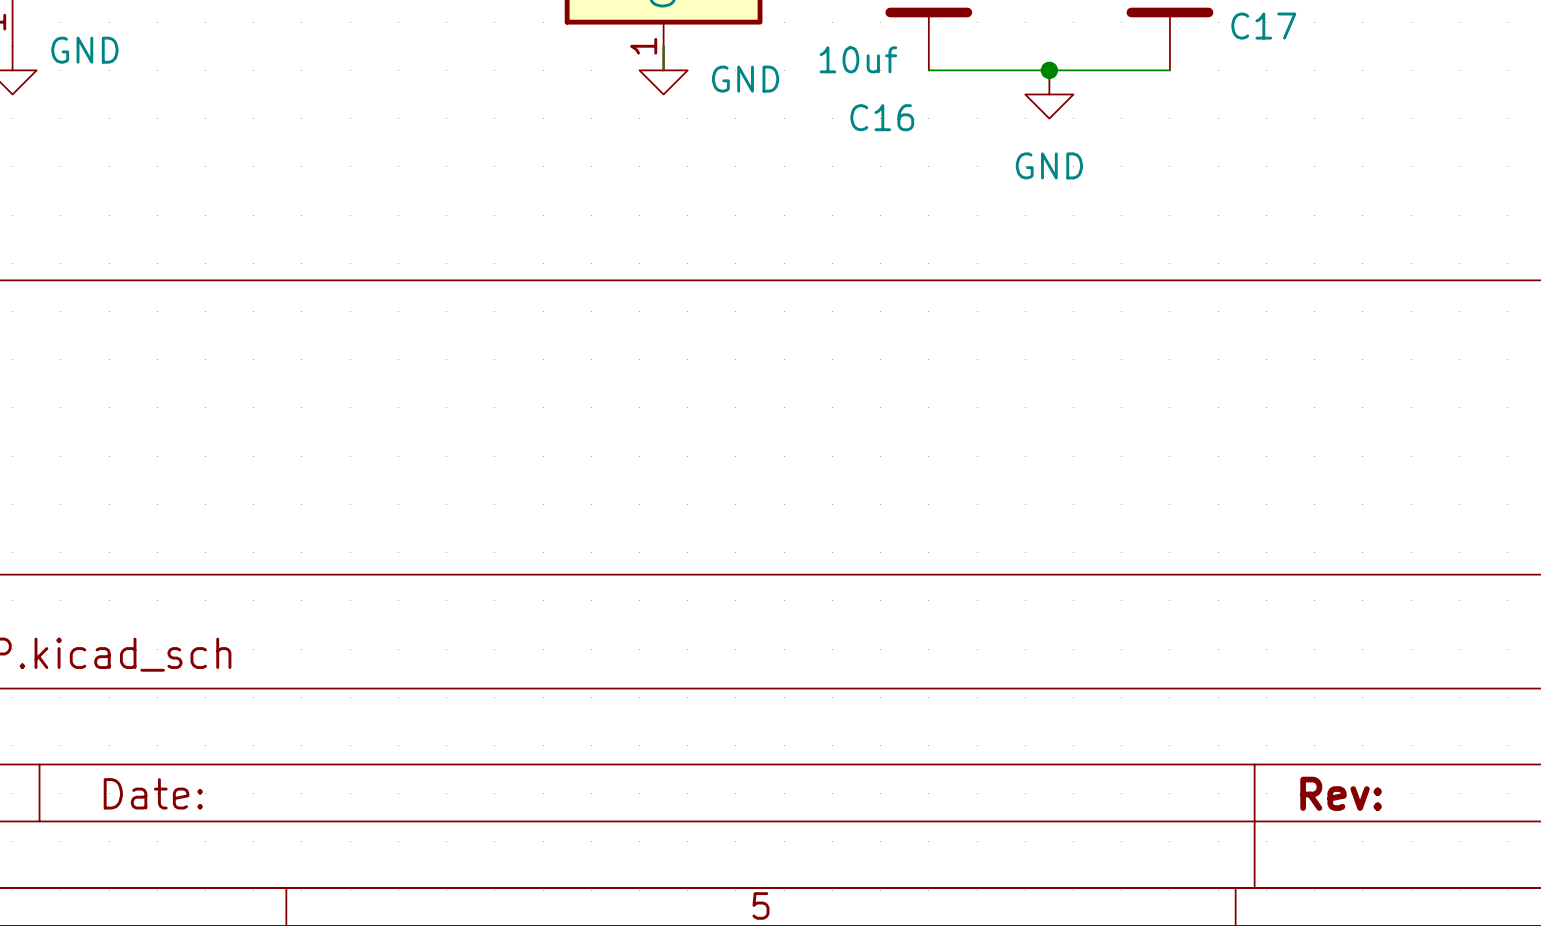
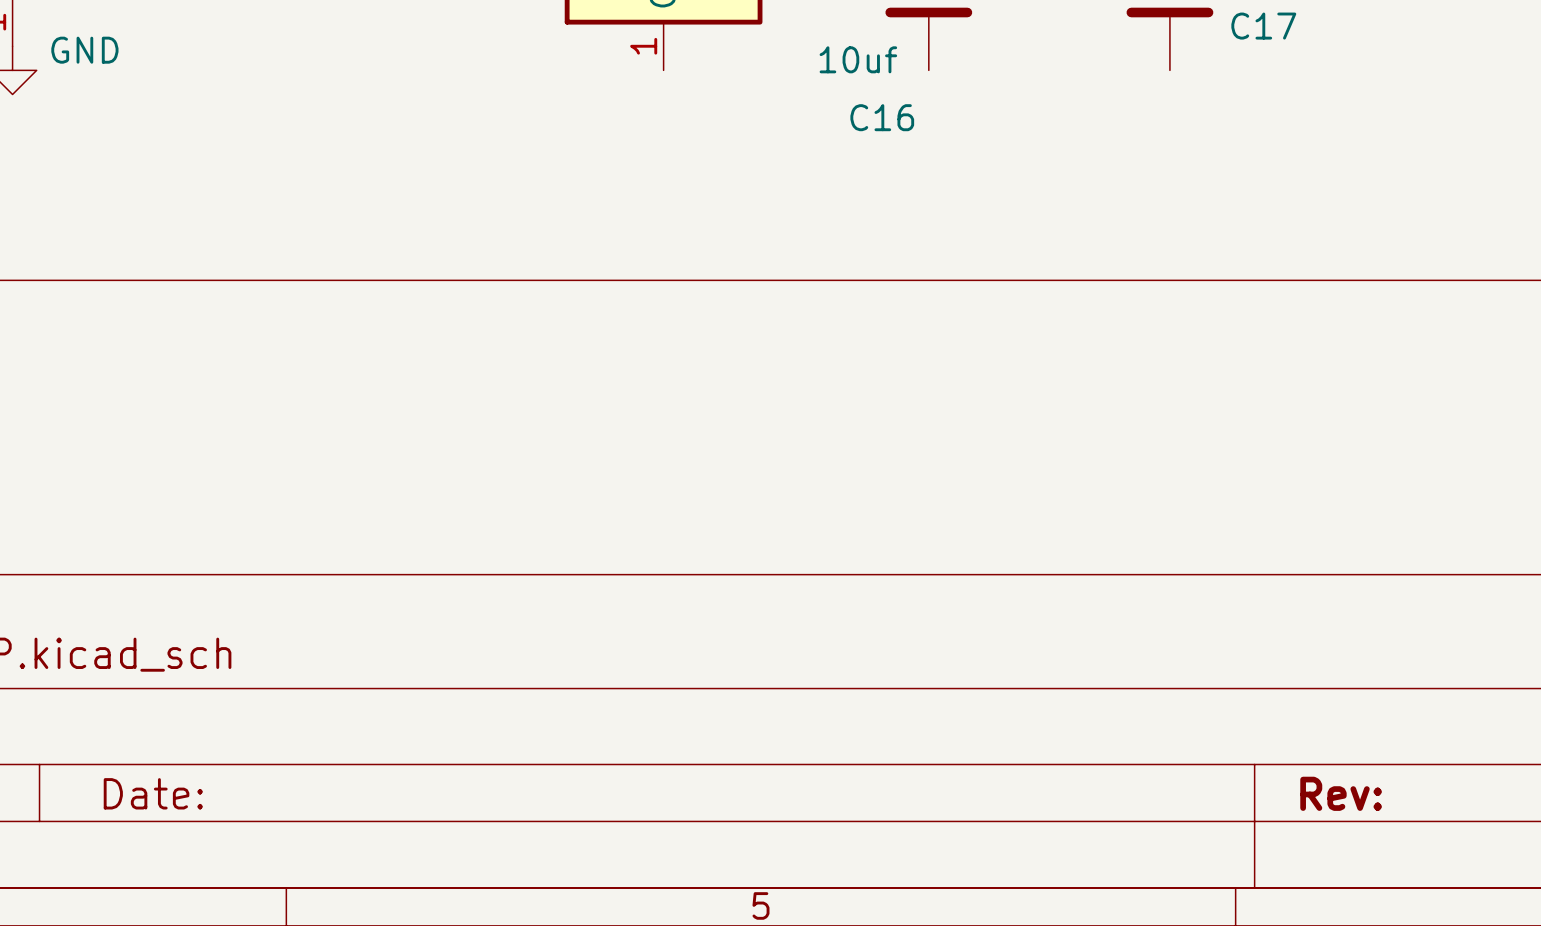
power symbol: GND (663, 70) -> none
wire: (928, 70) (1169, 70) -> none
junction: (1049, 70) -> none
power symbol: GND (1049, 94) -> none

